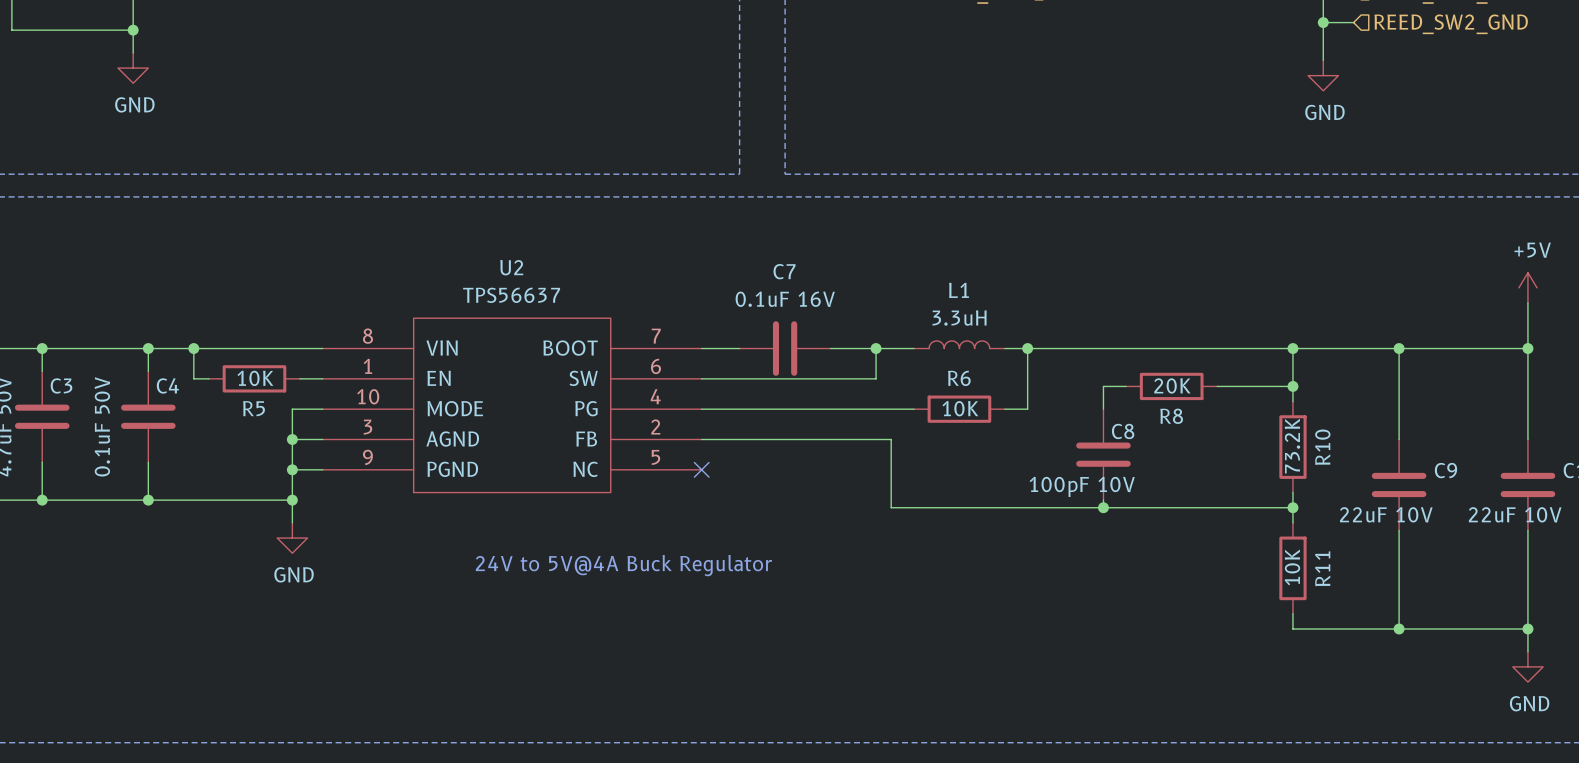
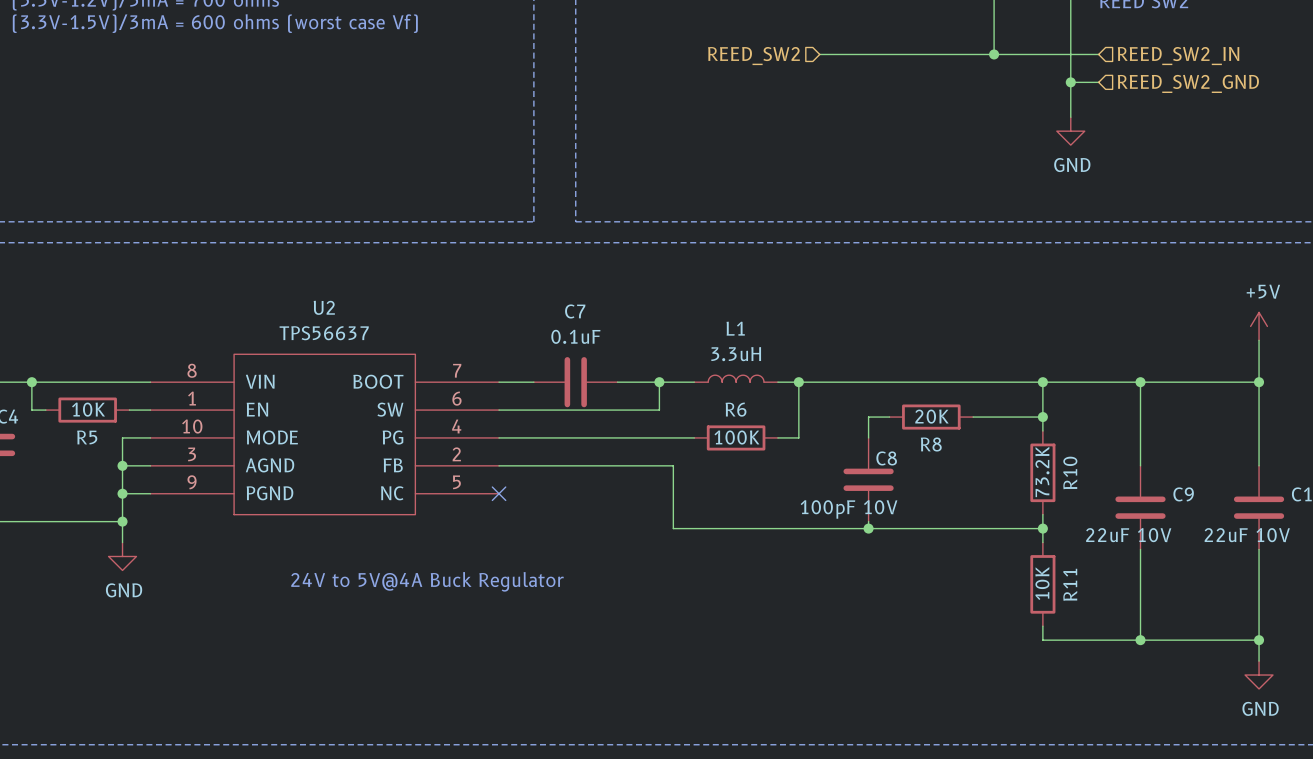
C7 value: 0.1uF 16V (785, 299) -> 0.1uF (575, 336)
R6 value: 10K (960, 408) -> 100K (736, 437)

